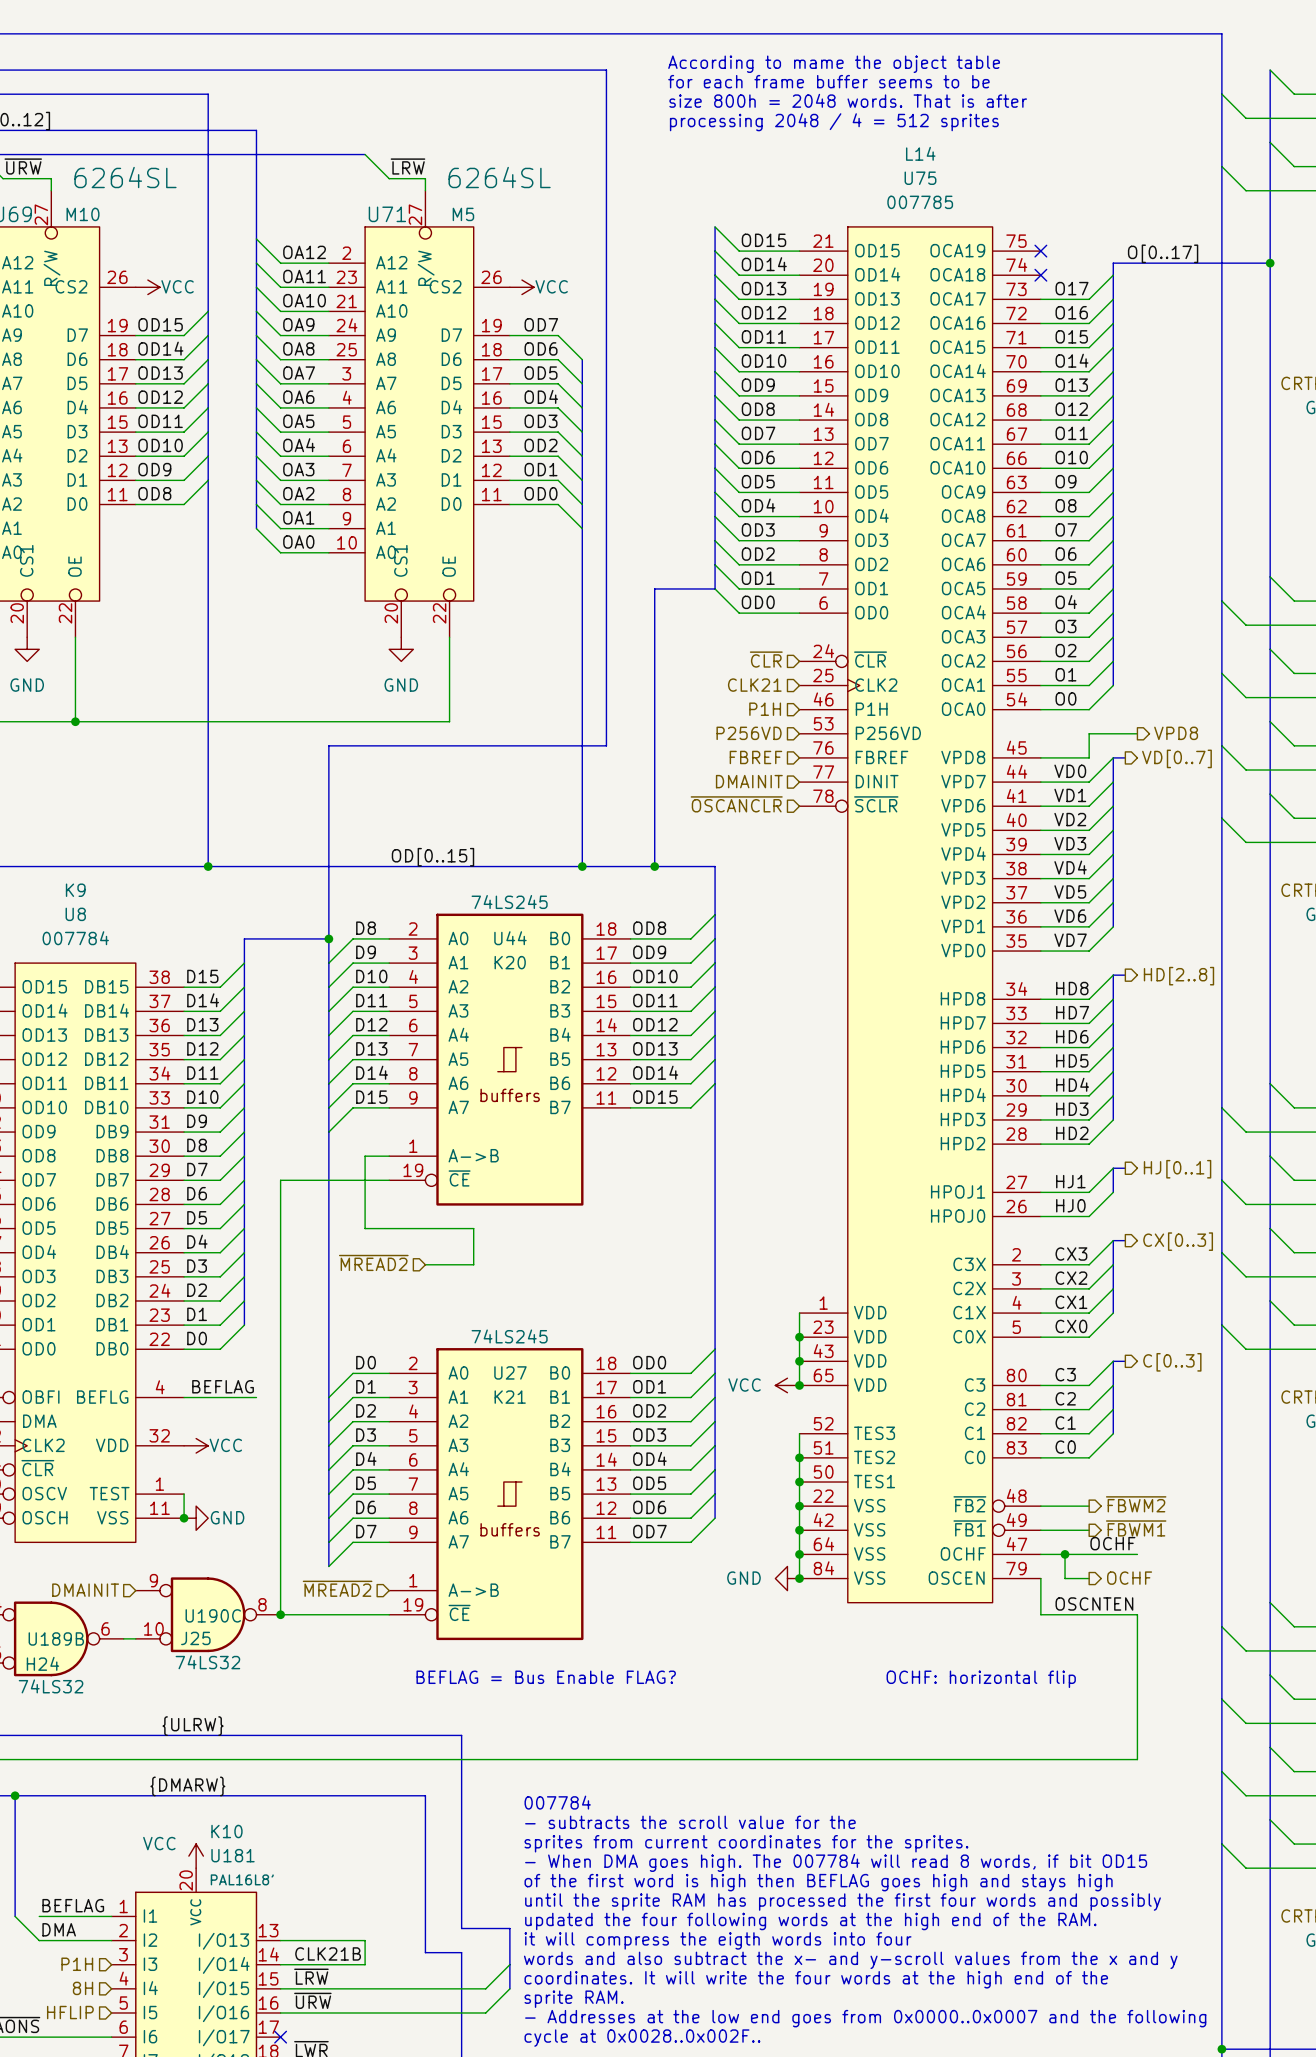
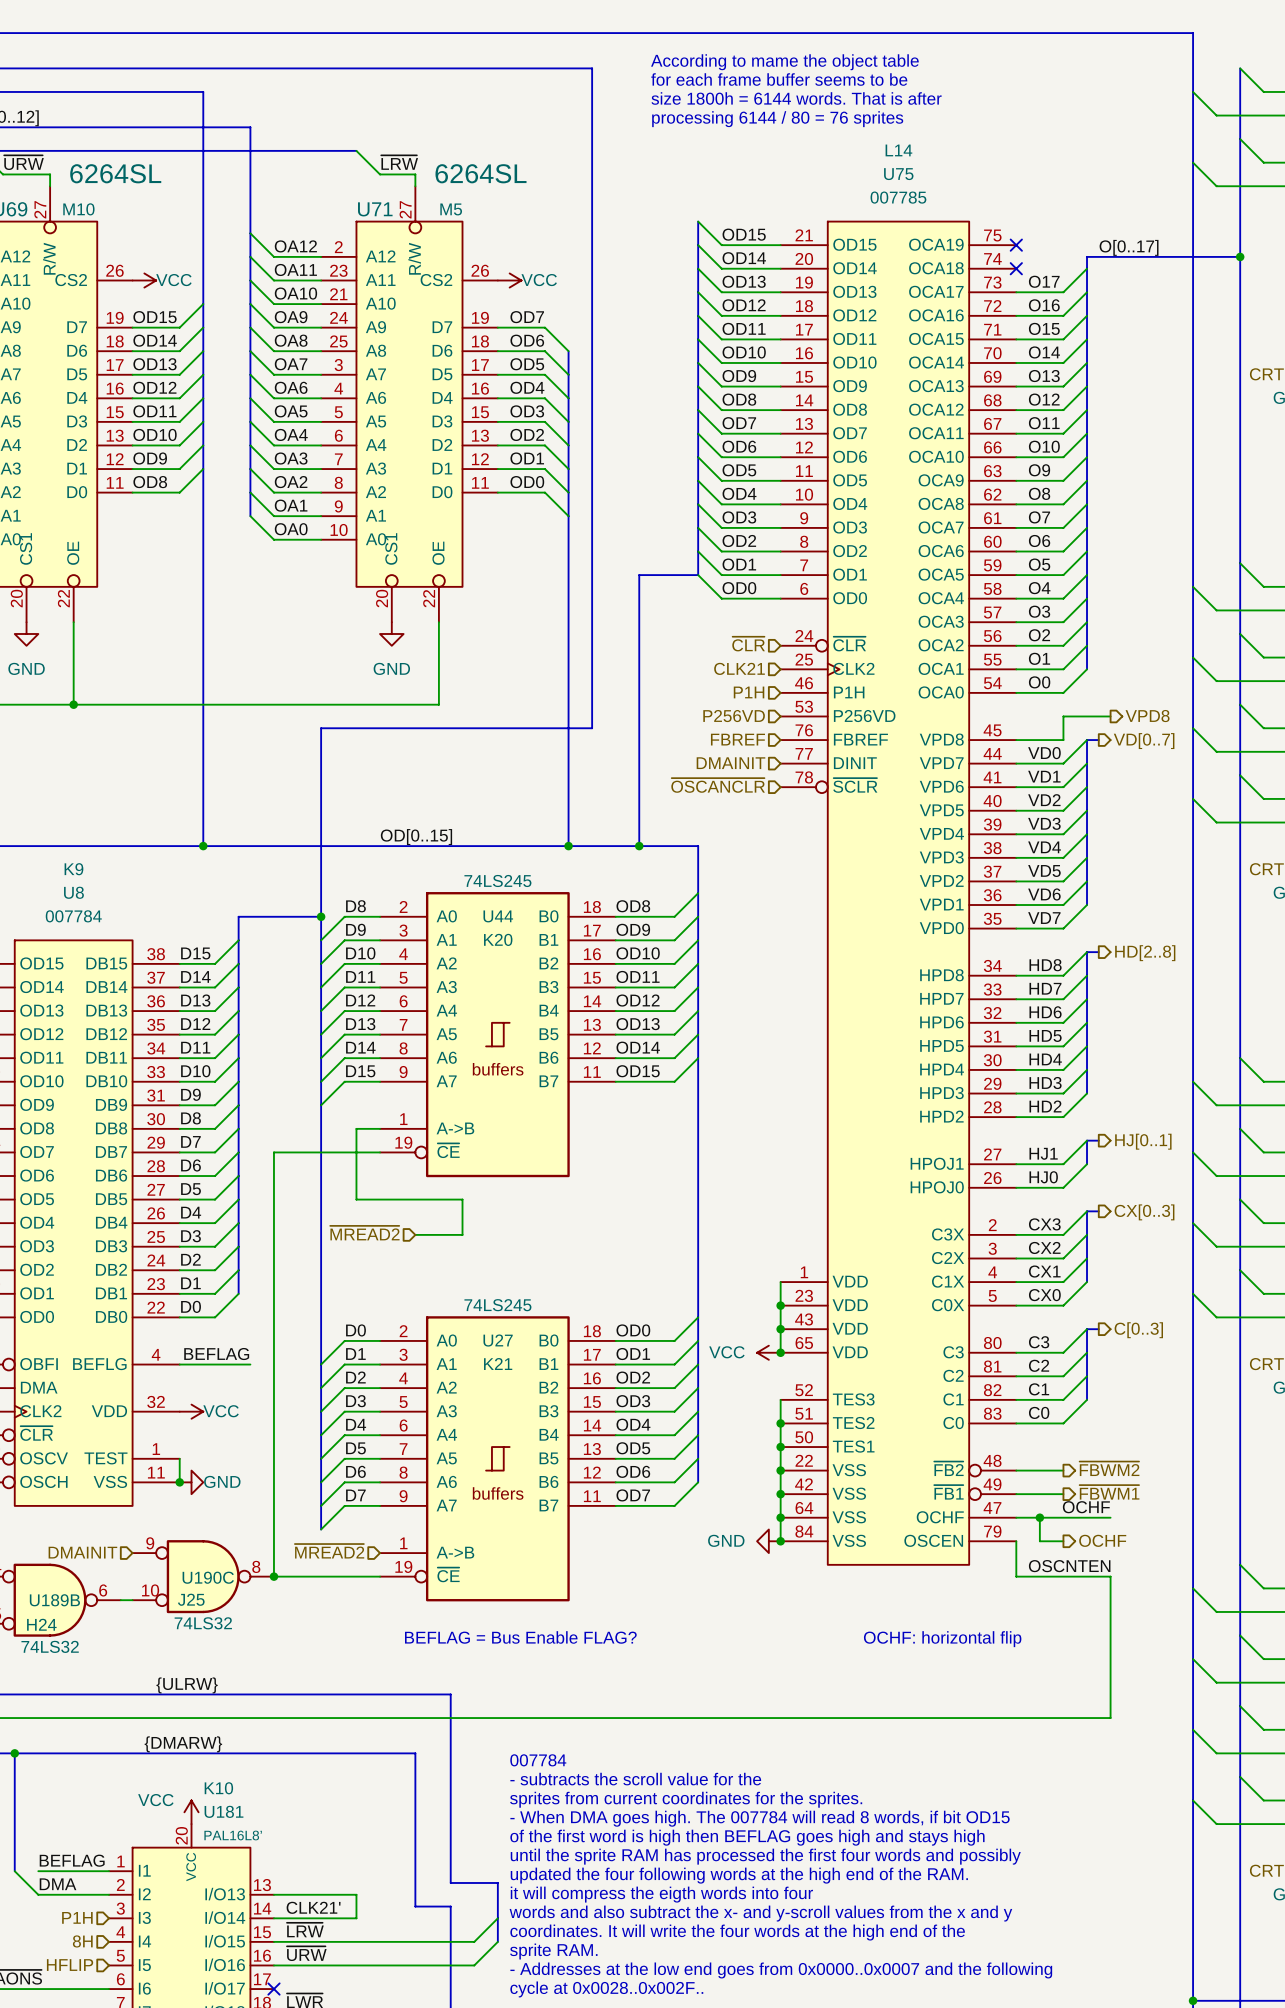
text: size 800h = 2048 words. That is after (848, 100) -> size 1800h = 6144 words. That is after (796, 98)
text: processing 2048 / 4 = 512 sprites (834, 122) -> processing 6144 / 80 = 76 sprites (777, 119)
label: CLK21B (328, 1953) -> CLK21' (313, 1907)

